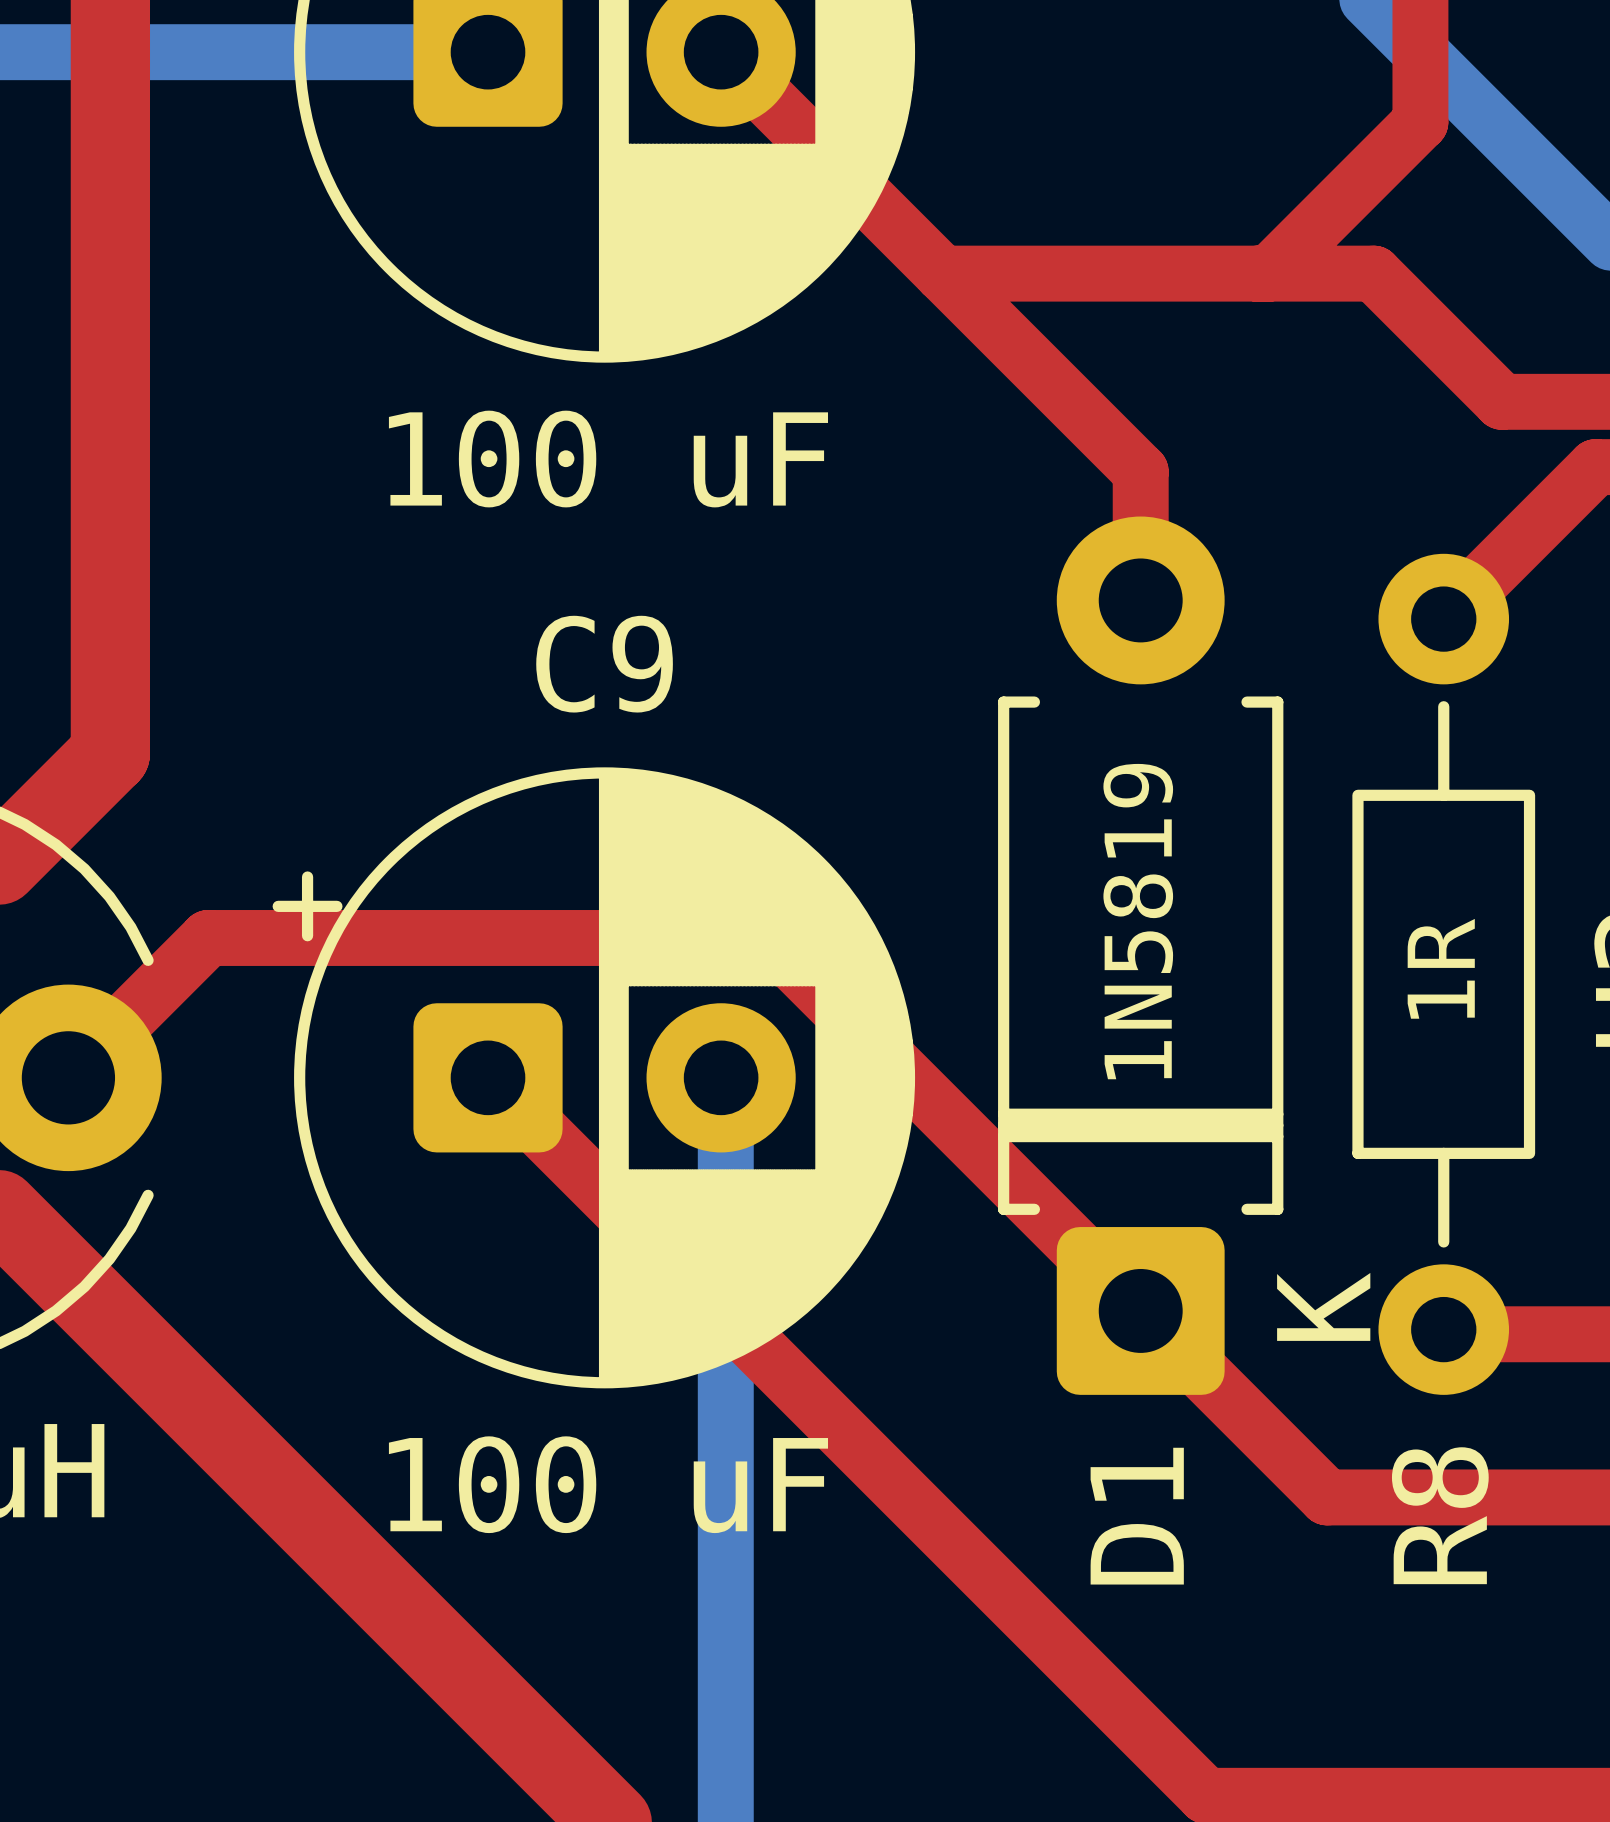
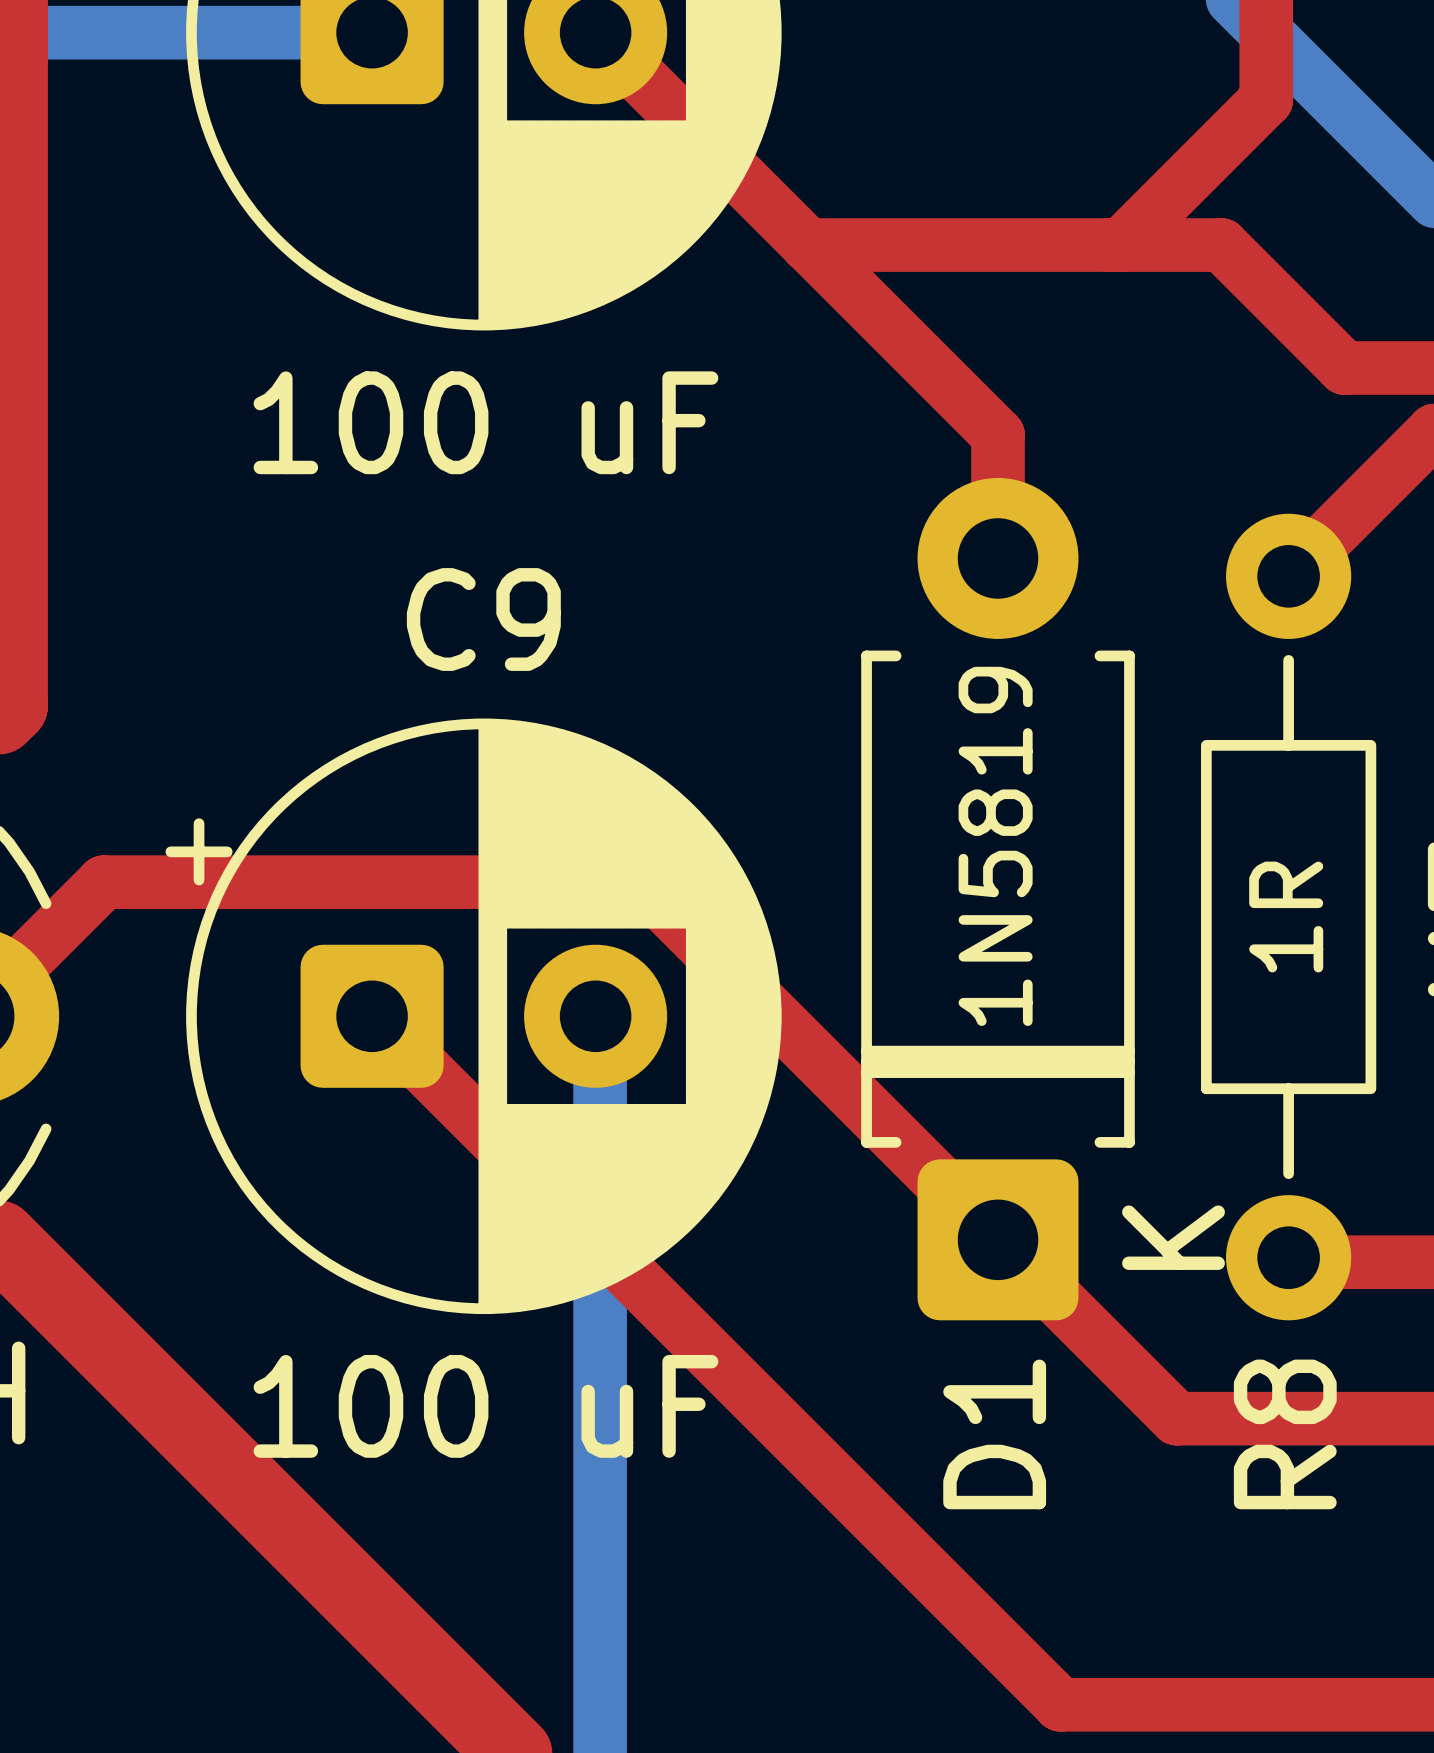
D1 value position: 1N5819 (1138, 921) -> 1N5819 (995, 846)

